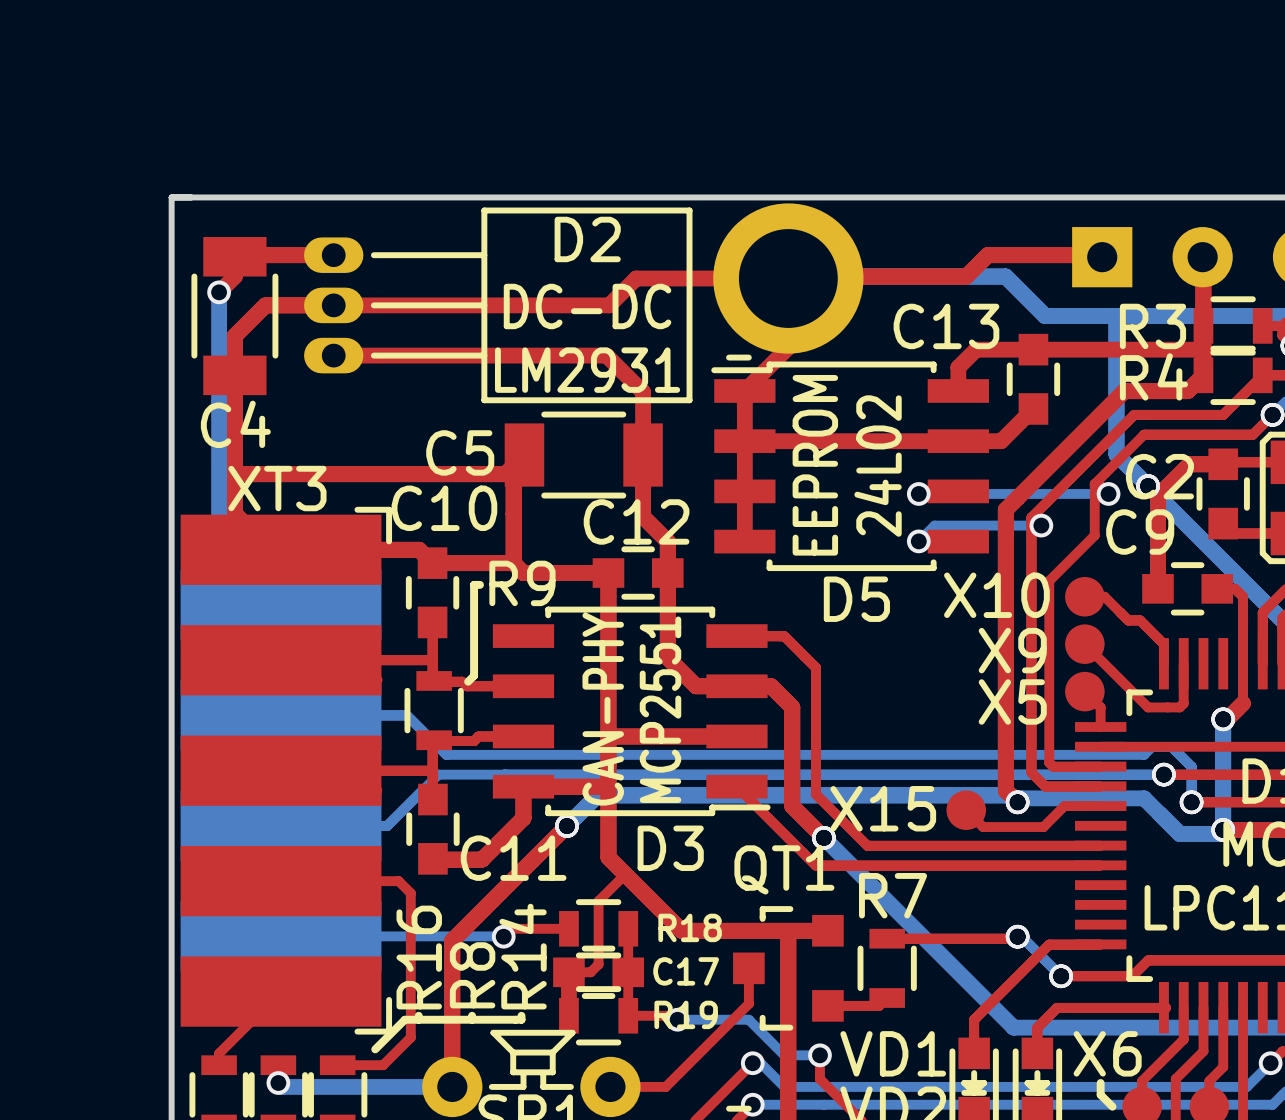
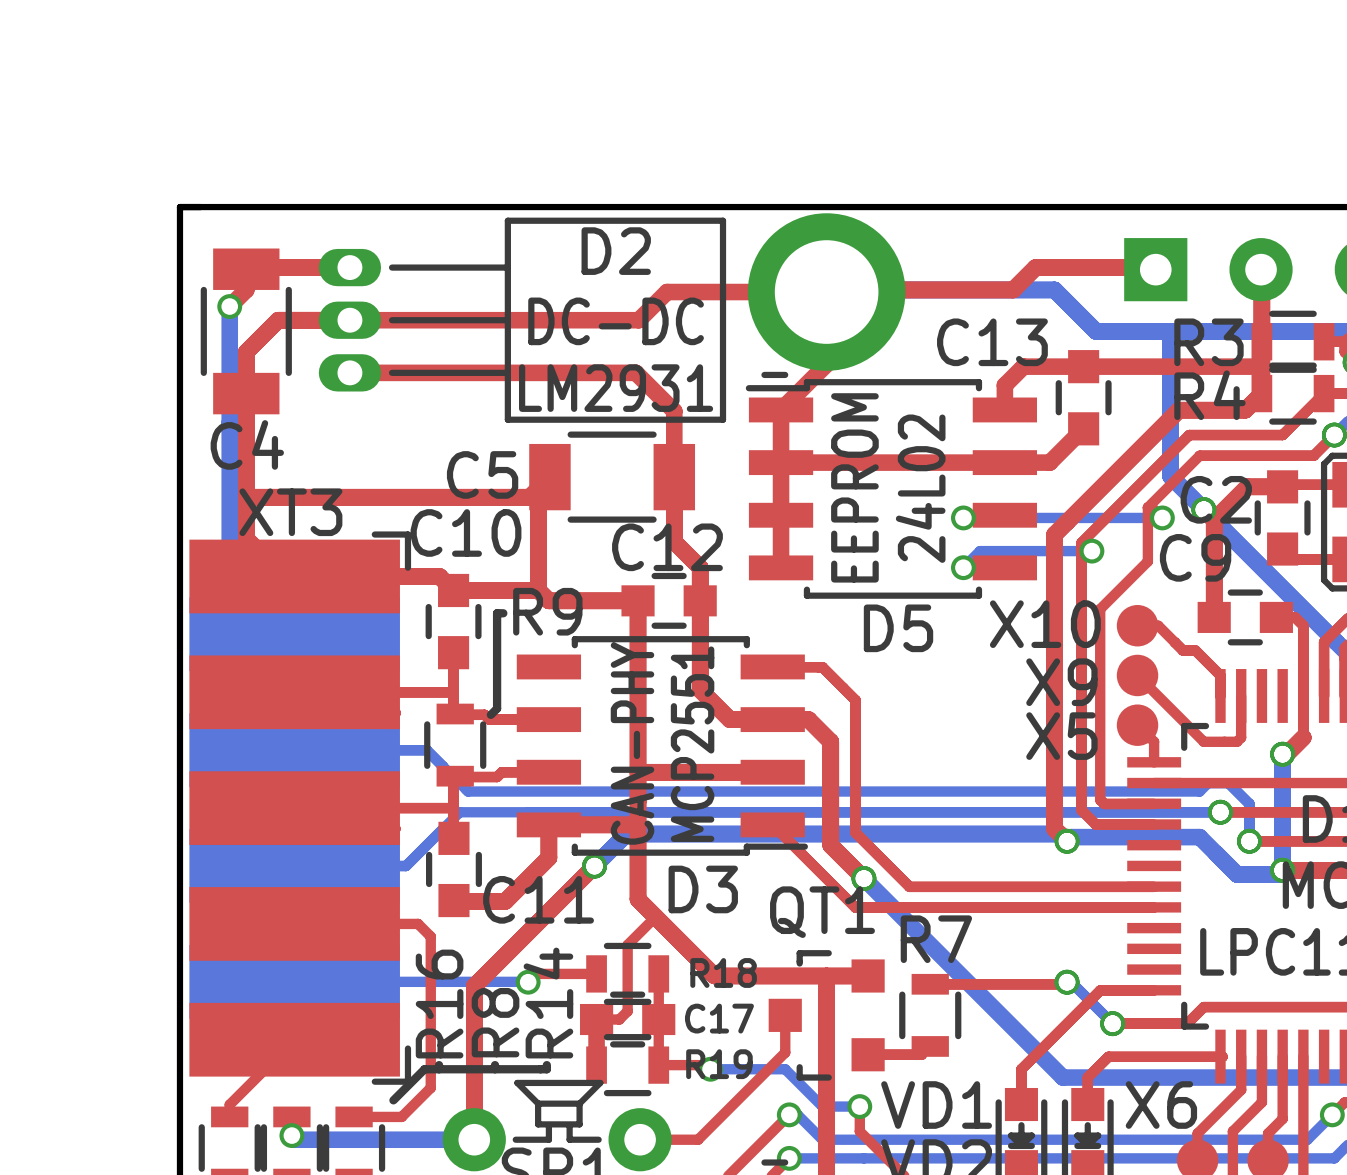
top track: (1100, 806) (1064, 806) (1043, 827) (983, 827) (966, 810) -> none
X15: (966, 810) -> none
line: (1100, 1082) (1100, 1094) (1112, 1106) -> none

